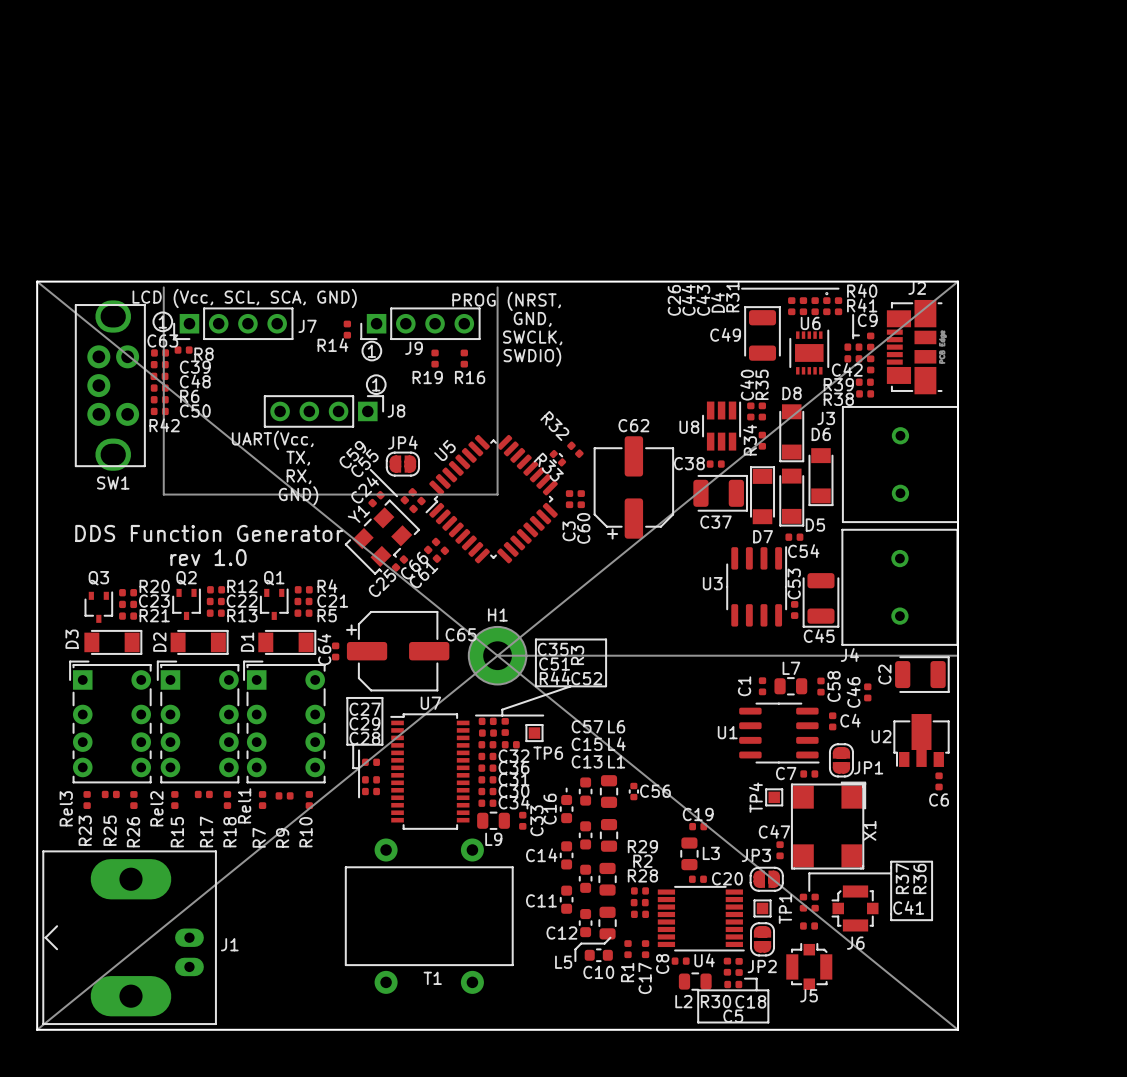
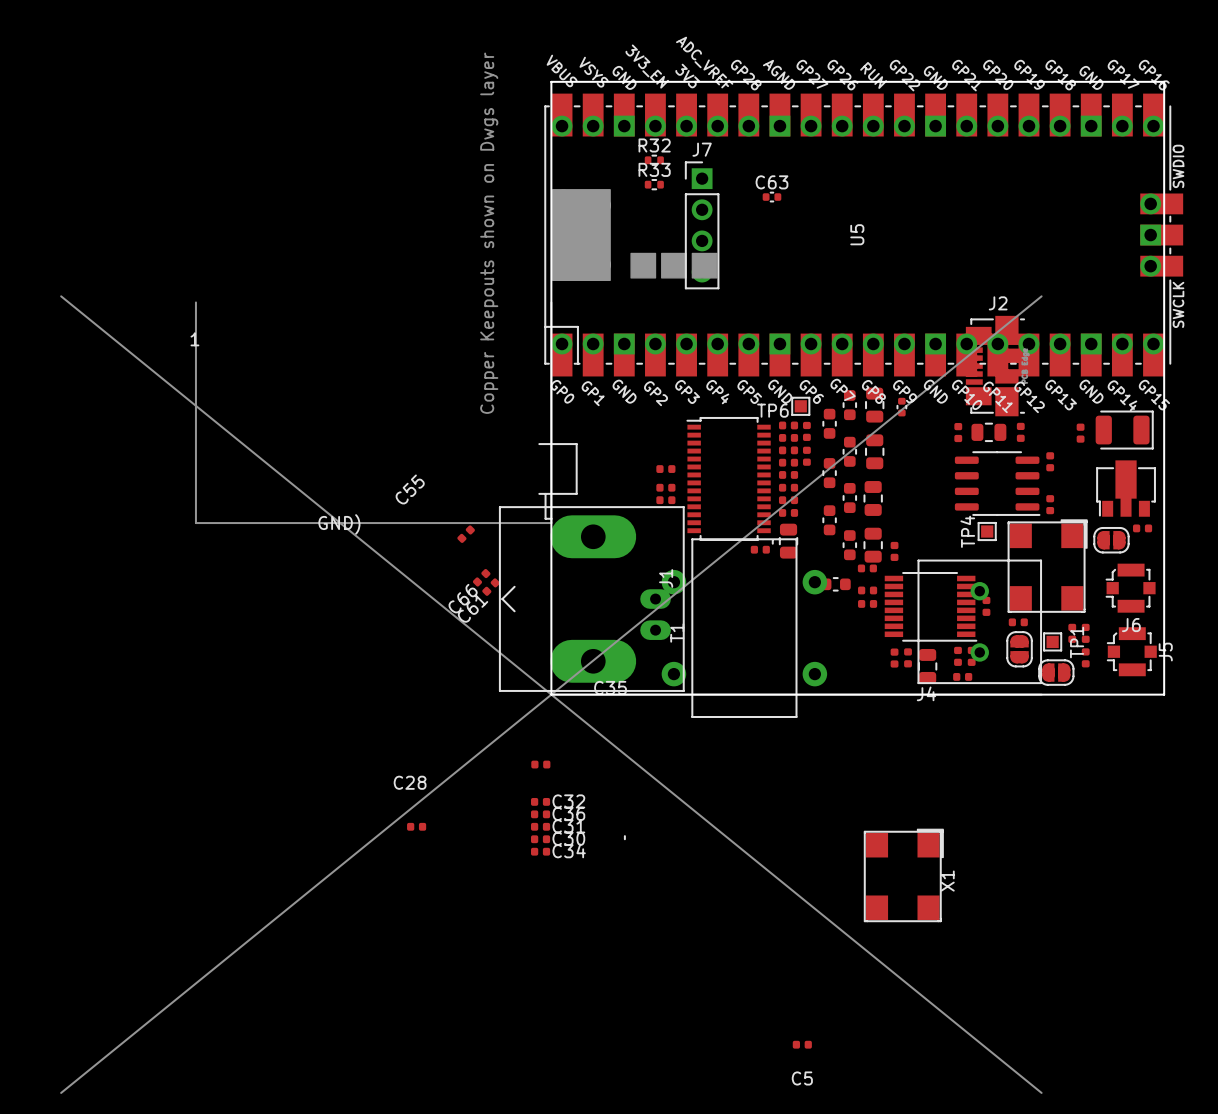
board edge: none -> (551, 81) (1164, 81) (1164, 694) (551, 694) (551, 81)
board edge: (37, 281) (37, 1029) (958, 1029) (958, 281) (37, 281) -> none
line: (742, 288) (838, 288) -> none
text: LCD (Vcc, SCL, SCA, GND) (244, 298) -> none
text: PROG (NRST, (506, 301) -> none
D4: (826, 303) -> none
C26: (791, 306) -> none
C44: (803, 306) -> none
C43: (815, 306) -> none
R31: (838, 306) -> none
drawing: [152, 311, 173, 332] -> none
line: (853, 314) (853, 338) -> none
text: GND, (532, 319) -> none
J7 rotation: 0° (233, 323) -> 90° clockwise (702, 225)
J7 position: (233, 323) -> (702, 225)
J9: (420, 323) -> none
J7 name position: J7 (307, 326) -> J7 (702, 149)
R14: (347, 329) -> none
C49: (762, 333) -> none
line: (853, 335) (858, 335) -> none
text: SWCLK, (532, 337) -> none
drawing: [361, 341, 387, 395] -> none
C9: (870, 341) -> none
C63 footprint: [174, 346, 193, 354] -> [762, 191, 782, 203]
R40: (853, 347) -> none
text: 1 (371, 351) -> none
R8: (160, 352) -> none
U6: (809, 352) -> none
text: SWDIO) (532, 356) -> none
R19: (435, 358) -> none
R16: (464, 358) -> none
R41: (853, 358) -> none
C39: (159, 364) -> none
C42: (870, 364) -> none
C48: (159, 376) -> none
R38: (864, 382) -> none
part: none -> (849, 405)
part: none -> (874, 405)
text: 1 (376, 384) -> none
SW1: (110, 385) -> none
part: none -> (901, 407)
R6: (159, 388) -> none
R39: (865, 393) -> none
C50: (159, 399) -> none
part: none -> (829, 423)
part: none -> (788, 425)
part: none -> (1124, 430)
part: none -> (806, 431)
part: none -> (958, 432)
part: none -> (988, 432)
part: none -> (1020, 432)
part: none -> (1080, 433)
R42: (159, 411) -> none
J8: (323, 411) -> none
C40: (750, 411) -> none
R35: (762, 411) -> none
part: none -> (788, 437)
line: none -> (539, 444) (576, 444) (576, 493) (539, 493)
part: none -> (788, 450)
U8: (721, 426) -> none
part: none -> (849, 451)
part: none -> (874, 451)
part: none -> (806, 456)
D8: (791, 433) -> none
U5 footprint: [425, 434, 558, 564] -> [544, 93, 1184, 377]
part: none -> (788, 462)
part: none -> (1050, 461)
text: UART(Vcc, (272, 440) -> none
R34: (762, 440) -> none
R32 footprint: [567, 441, 584, 458] -> [644, 154, 664, 166]
part: none -> (665, 469)
part: none -> (829, 473)
part: none -> (788, 474)
U5 name position: U5 (444, 450) -> U5 (857, 234)
part: none -> (728, 478)
part: none -> (997, 483)
text: TX, (298, 458) -> none
R33 rotation: 0° (557, 458) -> 45° counterclockwise (654, 184)
R33 position: (557, 458) -> (654, 184)
part: none -> (665, 487)
part: none -> (788, 487)
part: none -> (1126, 488)
JP4: (402, 464) -> none
C38: (715, 464) -> none
J3: (900, 464) -> none
line: none -> (545, 493) (545, 518) (551, 518)
R33 name position: R33 (548, 467) -> R33 (654, 169)
line: (370, 469) (397, 496) -> none
part: none -> (849, 498)
part: none -> (873, 498)
part: none -> (665, 500)
part: none -> (788, 500)
text: RX, (299, 476) -> none
D6: (820, 476) -> none
part: none -> (1050, 504)
part: none -> (788, 512)
C62: (633, 487) -> none
part: none -> (829, 520)
C37: (720, 493) -> none
D7: (762, 495) -> none
C59: (408, 496) -> none
D5: (791, 497) -> none
C24: (376, 499) -> none
C3: (569, 499) -> none
C60: (581, 499) -> none
part: none -> (1142, 528)
part: none -> (1111, 540)
line: none -> (772, 540) (772, 543)
part: none -> (788, 541)
part: none -> (849, 545)
part: none -> (873, 545)
part: none -> (760, 549)
part: none -> (894, 551)
text: DDS Function Generator (209, 533) -> none
part: none -> (1047, 565)
Y1: (382, 537) -> none
C54 name: C54 (803, 551) -> none
part: none -> (835, 584)
text: rev 1.0 (208, 557) -> none
part: none -> (867, 590)
C25: (399, 563) -> none
part: none -> (867, 603)
part: none -> (986, 606)
part: none -> (931, 606)
U3: (756, 586) -> none
part: none -> (1018, 622)
R12: (216, 589) -> none
R4: (303, 589) -> none
R20: (128, 592) -> none
part: none -> (1072, 633)
part: none -> (1085, 633)
C45: (820, 600) -> none
C22: (215, 601) -> none
C21: (303, 601) -> none
C23: (128, 604) -> none
Q2: (186, 604) -> none
Q1: (274, 604) -> none
Q3: (98, 607) -> none
C53: (794, 609) -> none
R13: (215, 613) -> none
R5: (303, 613) -> none
part: none -> (1019, 649)
R21: (128, 616) -> none
part: none -> (957, 656)
part: none -> (971, 656)
part: none -> (894, 658)
part: none -> (908, 657)
part: none -> (1085, 657)
part: none -> (927, 666)
part: none -> (1056, 672)
part: none -> (962, 676)
D3: (113, 642) -> none
D2: (199, 642) -> none
D1: (287, 642) -> none
C64: (335, 651) -> none
C65: (397, 651) -> none
H1: (497, 655) -> none
C2: (922, 674) -> none
line: (570, 686) (502, 709) (502, 715) -> none
line: (606, 686) (606, 639) (535, 639) (535, 686) (605, 686) -> none
C1: (762, 686) -> none
L7: (790, 686) -> none
C58: (820, 686) -> none
C46: (867, 692) -> none
line: (347, 697) (347, 744) (382, 744) (382, 697) (347, 697) -> none
line: (475, 715) (543, 715) -> none
Rel3: (110, 721) -> none
Rel2: (198, 721) -> none
Rel1: (284, 721) -> none
C4: (832, 721) -> none
R3: (505, 726) -> none
C51: (487, 733) -> none
TP6 position: (534, 733) -> (800, 406)
U1: (779, 733) -> none
U2: (921, 740) -> none
line: (353, 744) (353, 768) (359, 768) -> none
R44: (487, 744) -> none
C52: (510, 744) -> none
line: (359, 750) (359, 797) -> none
TP6 name position: TP6 (548, 753) -> TP6 (772, 410)
JP1: (841, 760) -> none
C27: (371, 762) -> none
U7: (429, 771) -> none
C7: (809, 773) -> none
C6: (939, 781) -> none
C29: (371, 791) -> none
C57: (585, 791) -> none
L6: (609, 791) -> none
C56: (633, 791) -> none
R25: (110, 794) -> none
R17: (203, 794) -> none
R9: (284, 795) -> none
TP4 position: (774, 797) -> (987, 531)
R23: (87, 800) -> none
R26: (133, 800) -> none
R15: (174, 800) -> none
R18: (227, 800) -> none
R7: (262, 800) -> none
R10: (309, 800) -> none
C16: (566, 809) -> none
L9: (493, 820) -> none
C33: (522, 820) -> none
C19: (698, 826) -> none
C15: (585, 835) -> none
L4: (609, 835) -> none
C47: (780, 850) -> none
L3: (689, 853) -> none
C14: (566, 855) -> none
line: (891, 861) (891, 920) (932, 920) (932, 861) (891, 861) -> none
line: (891, 873) (809, 873) (809, 890) -> none
C13: (585, 878) -> none
L1: (607, 879) -> none
C20: (697, 879) -> none
JP3: (766, 879) -> none
R29: (639, 890) -> none
C11: (566, 899) -> none
R2: (639, 902) -> none
R36: (803, 902) -> none
R37: (815, 902) -> none
TP1 position: (762, 908) -> (1052, 641)
J6 position: (855, 908) -> (1130, 588)
R28: (639, 914) -> none
T1 rotation: 0° (429, 916) -> 90° clockwise (744, 628)
T1 position: (429, 916) -> (744, 628)
U4: (701, 918) -> none
C12: (585, 923) -> none
L5: (607, 923) -> none
C41: (809, 926) -> none
J1 position: (129, 937) -> (591, 599)
line: (610, 937) (604, 943) (581, 943) (575, 949) (575, 961) -> none
JP2: (762, 939) -> none
J1 name rotation: 0° (229, 944) -> 90° counterclockwise (666, 578)
J1 name position: J1 (229, 944) -> J1 (666, 578)
R1: (628, 949) -> none
C17: (645, 949) -> none
C10: (598, 955) -> none
C8: (680, 961) -> none
R30: (727, 966) -> none
C18: (739, 966) -> none
J5 rotation: 0° (809, 966) -> 90° counterclockwise (1131, 651)
J5 position: (809, 966) -> (1131, 651)
line: (744, 978) (756, 978) (756, 990) -> none
L2: (695, 981) -> none
line: (698, 990) (698, 1022) (768, 1022) (768, 990) (698, 990) -> none

